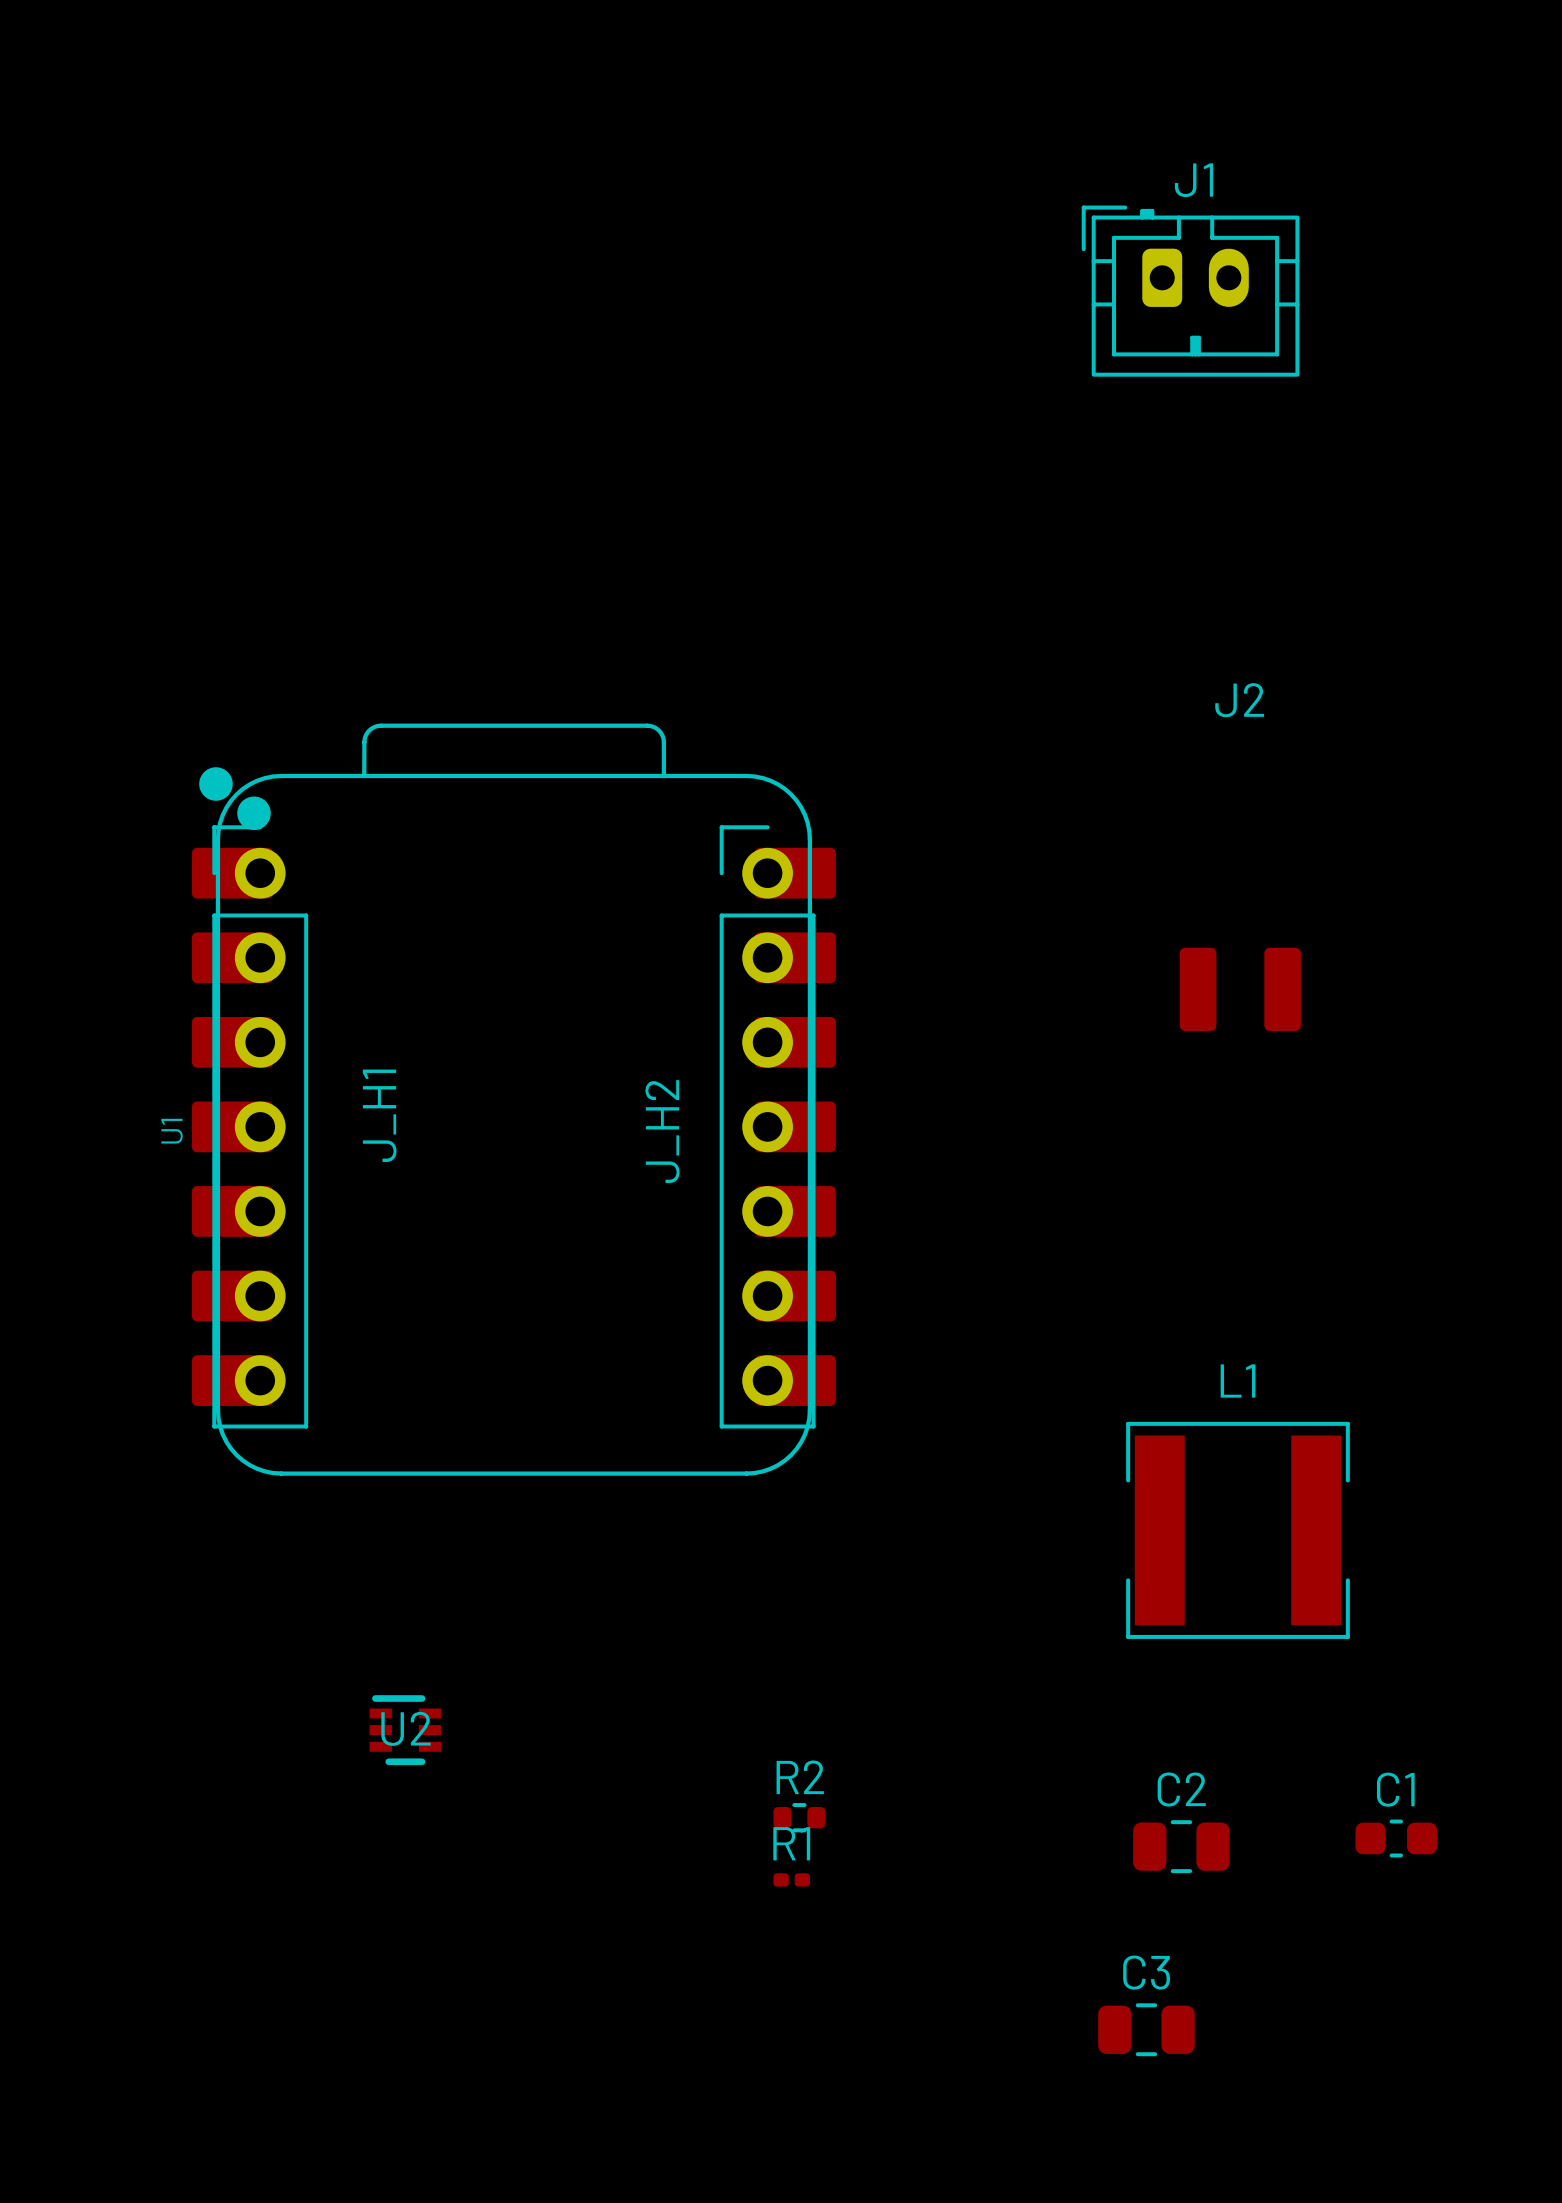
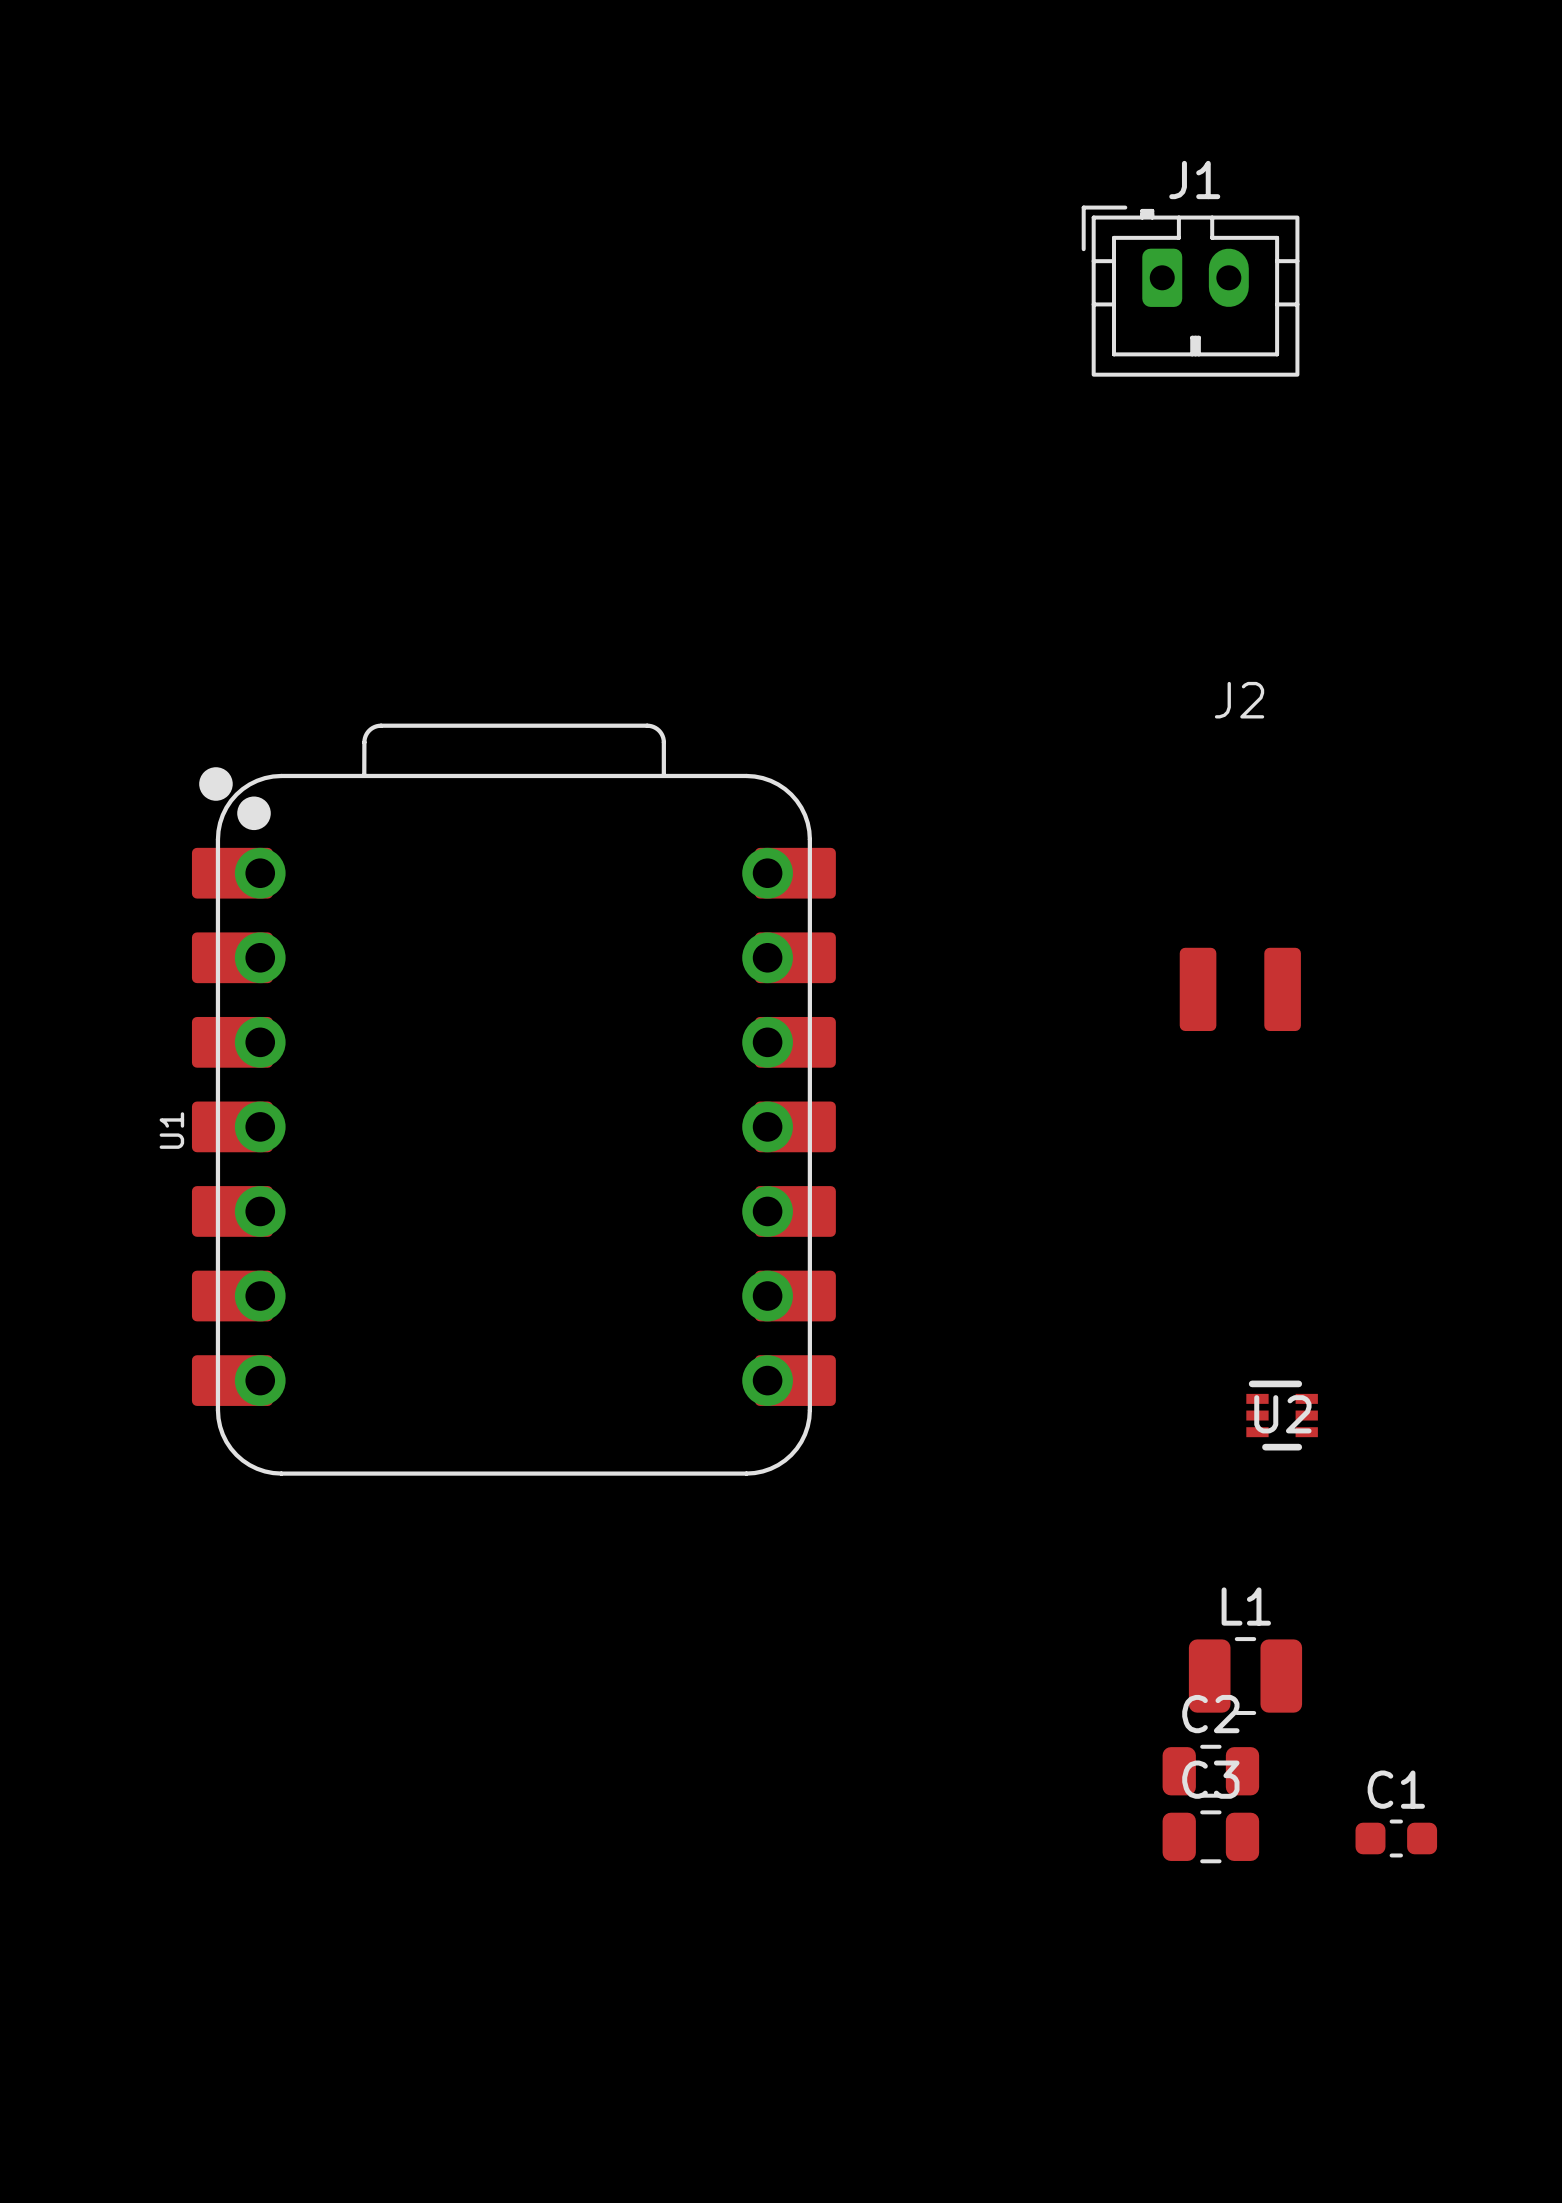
J_H1: (260, 1126) -> none
J_H2: (767, 1126) -> none
L1 name position: L1 (1238, 1380) -> L1 (1246, 1606)
L1 footprint: [1126, 1421, 1350, 1639] -> [1188, 1637, 1303, 1715]
U2 position: (405, 1730) -> (1282, 1415)
R2: (799, 1817) -> none
C2 position: (1181, 1846) -> (1210, 1771)
R1: (791, 1879) -> none
C3 position: (1146, 2029) -> (1210, 1836)

